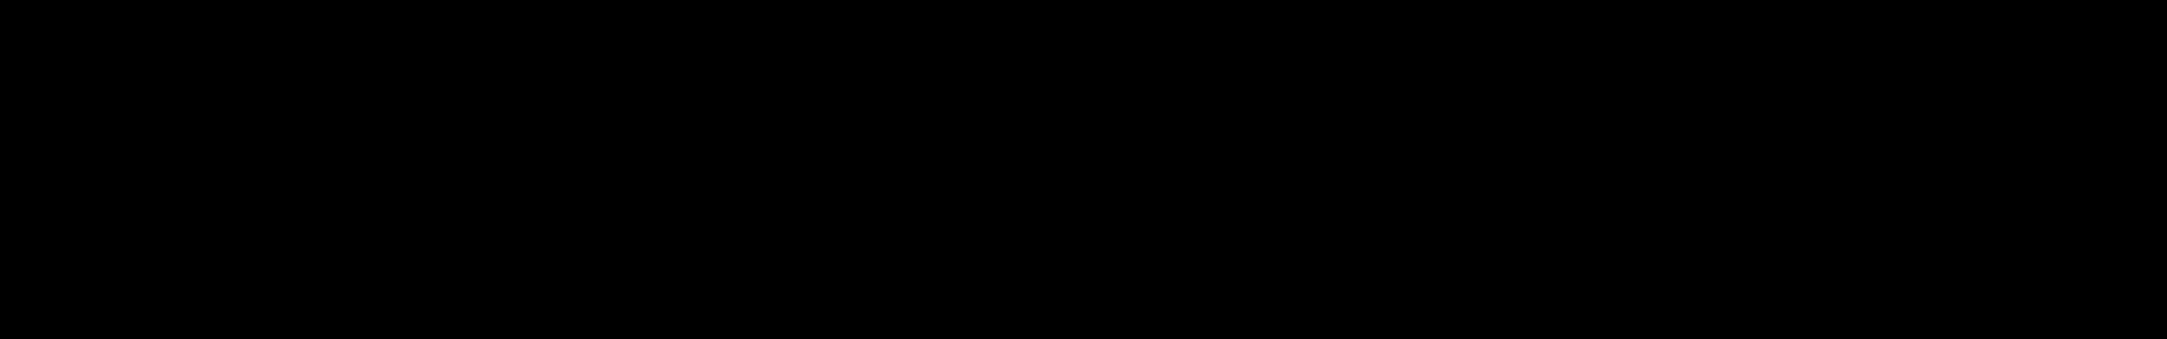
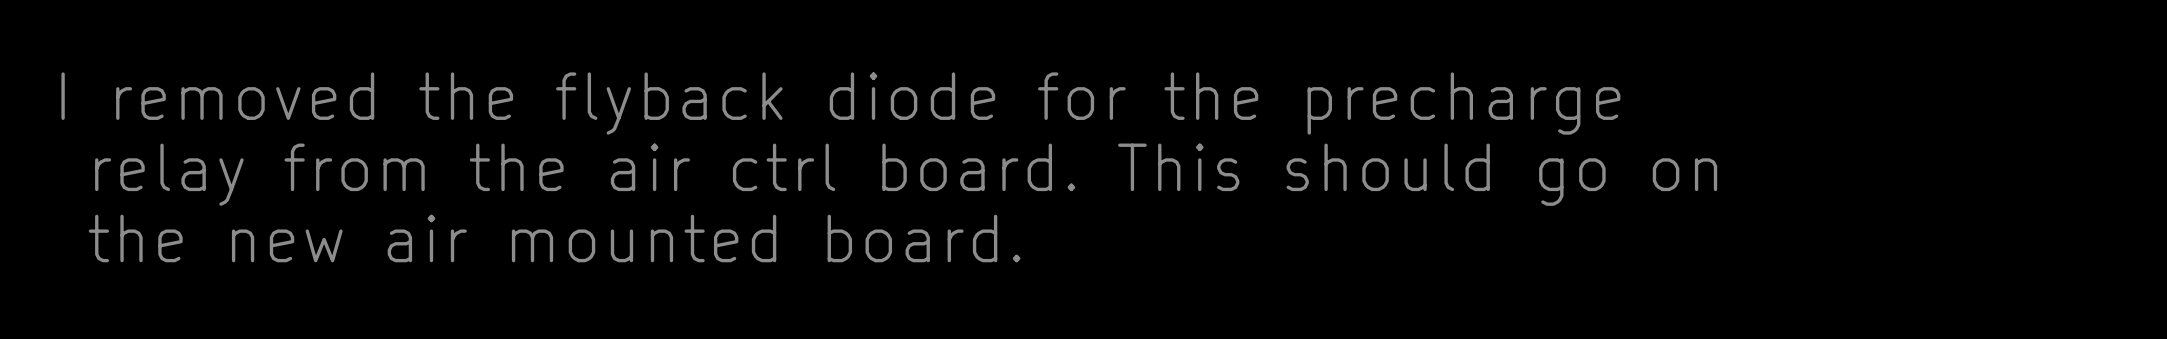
text: none -> I removed the flyback diode for the precharge (840, 103)
text: none -> relay from the air ctrl board. This should go on (906, 174)
text: none -> the new air mounted board. (554, 238)

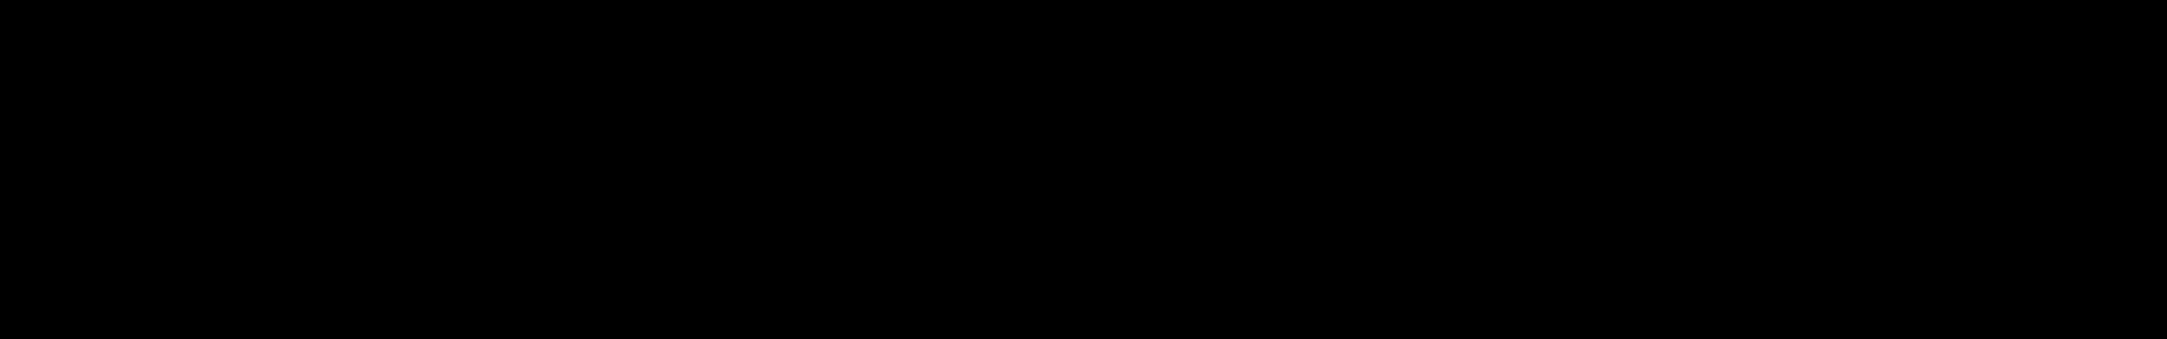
text: I removed the flyback diode for the precharge (840, 103) -> none
text: relay from the air ctrl board. This should go on (906, 174) -> none
text: the new air mounted board. (554, 238) -> none

